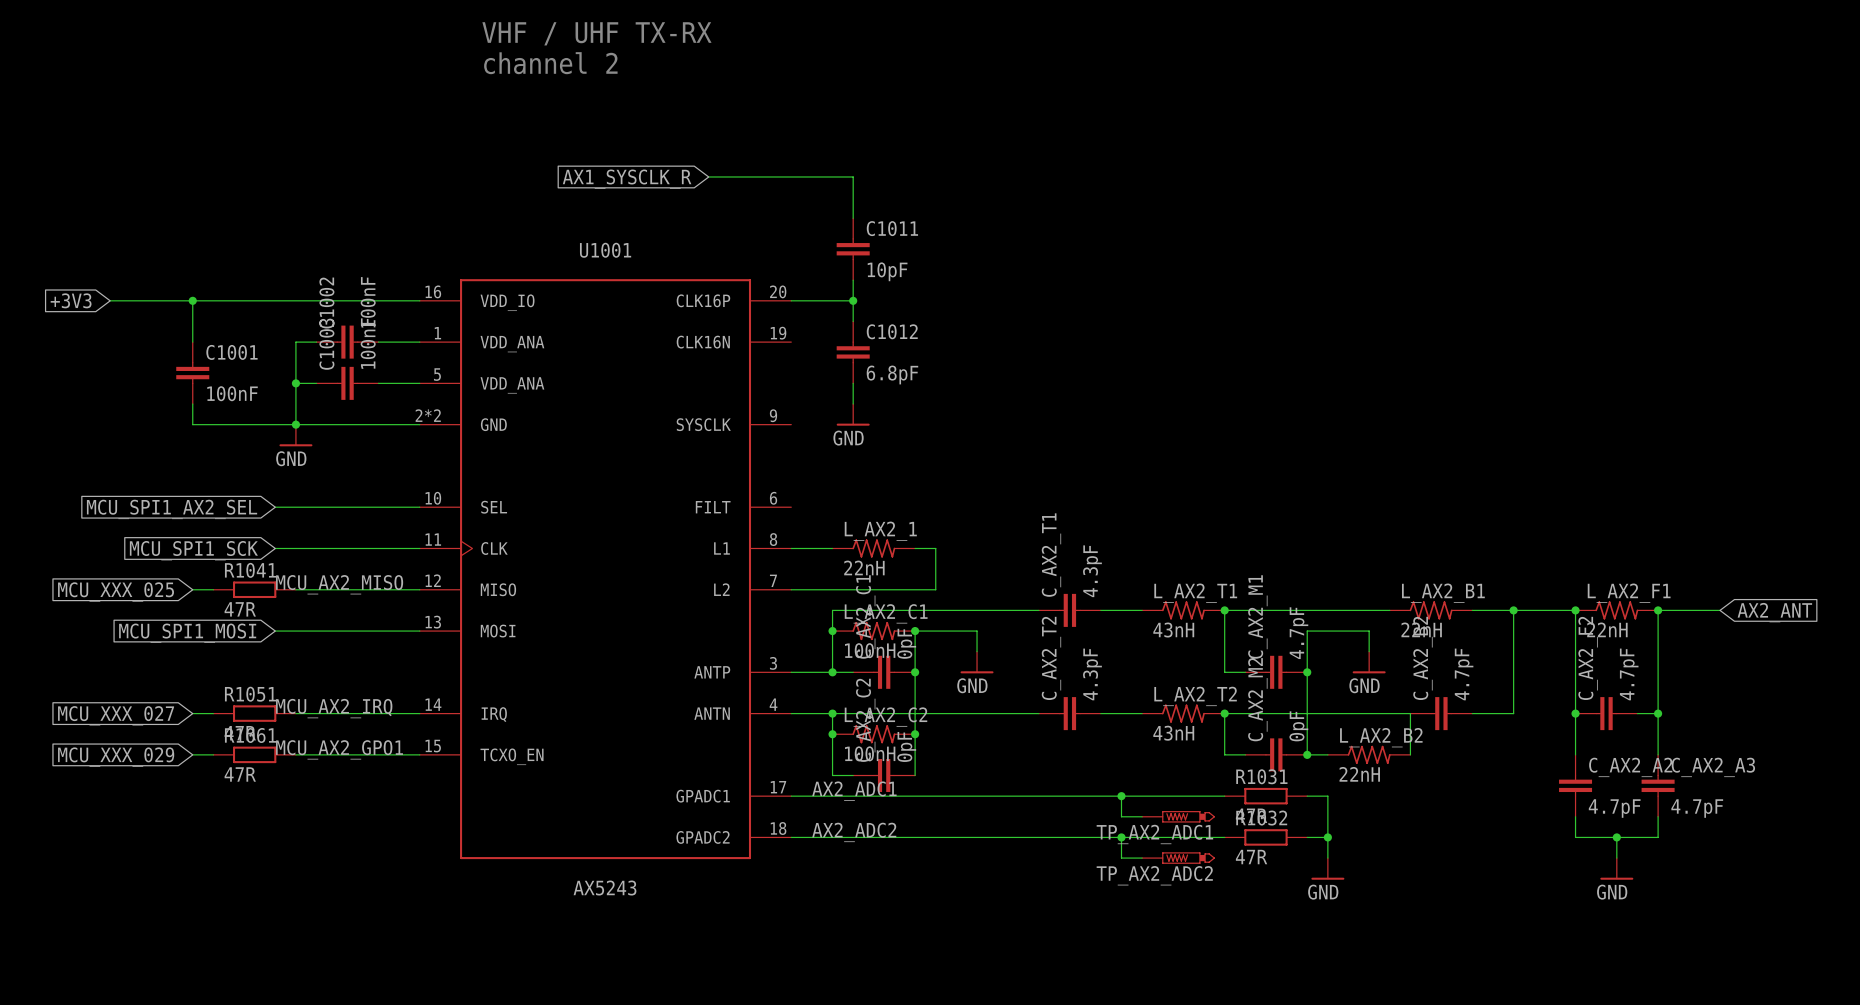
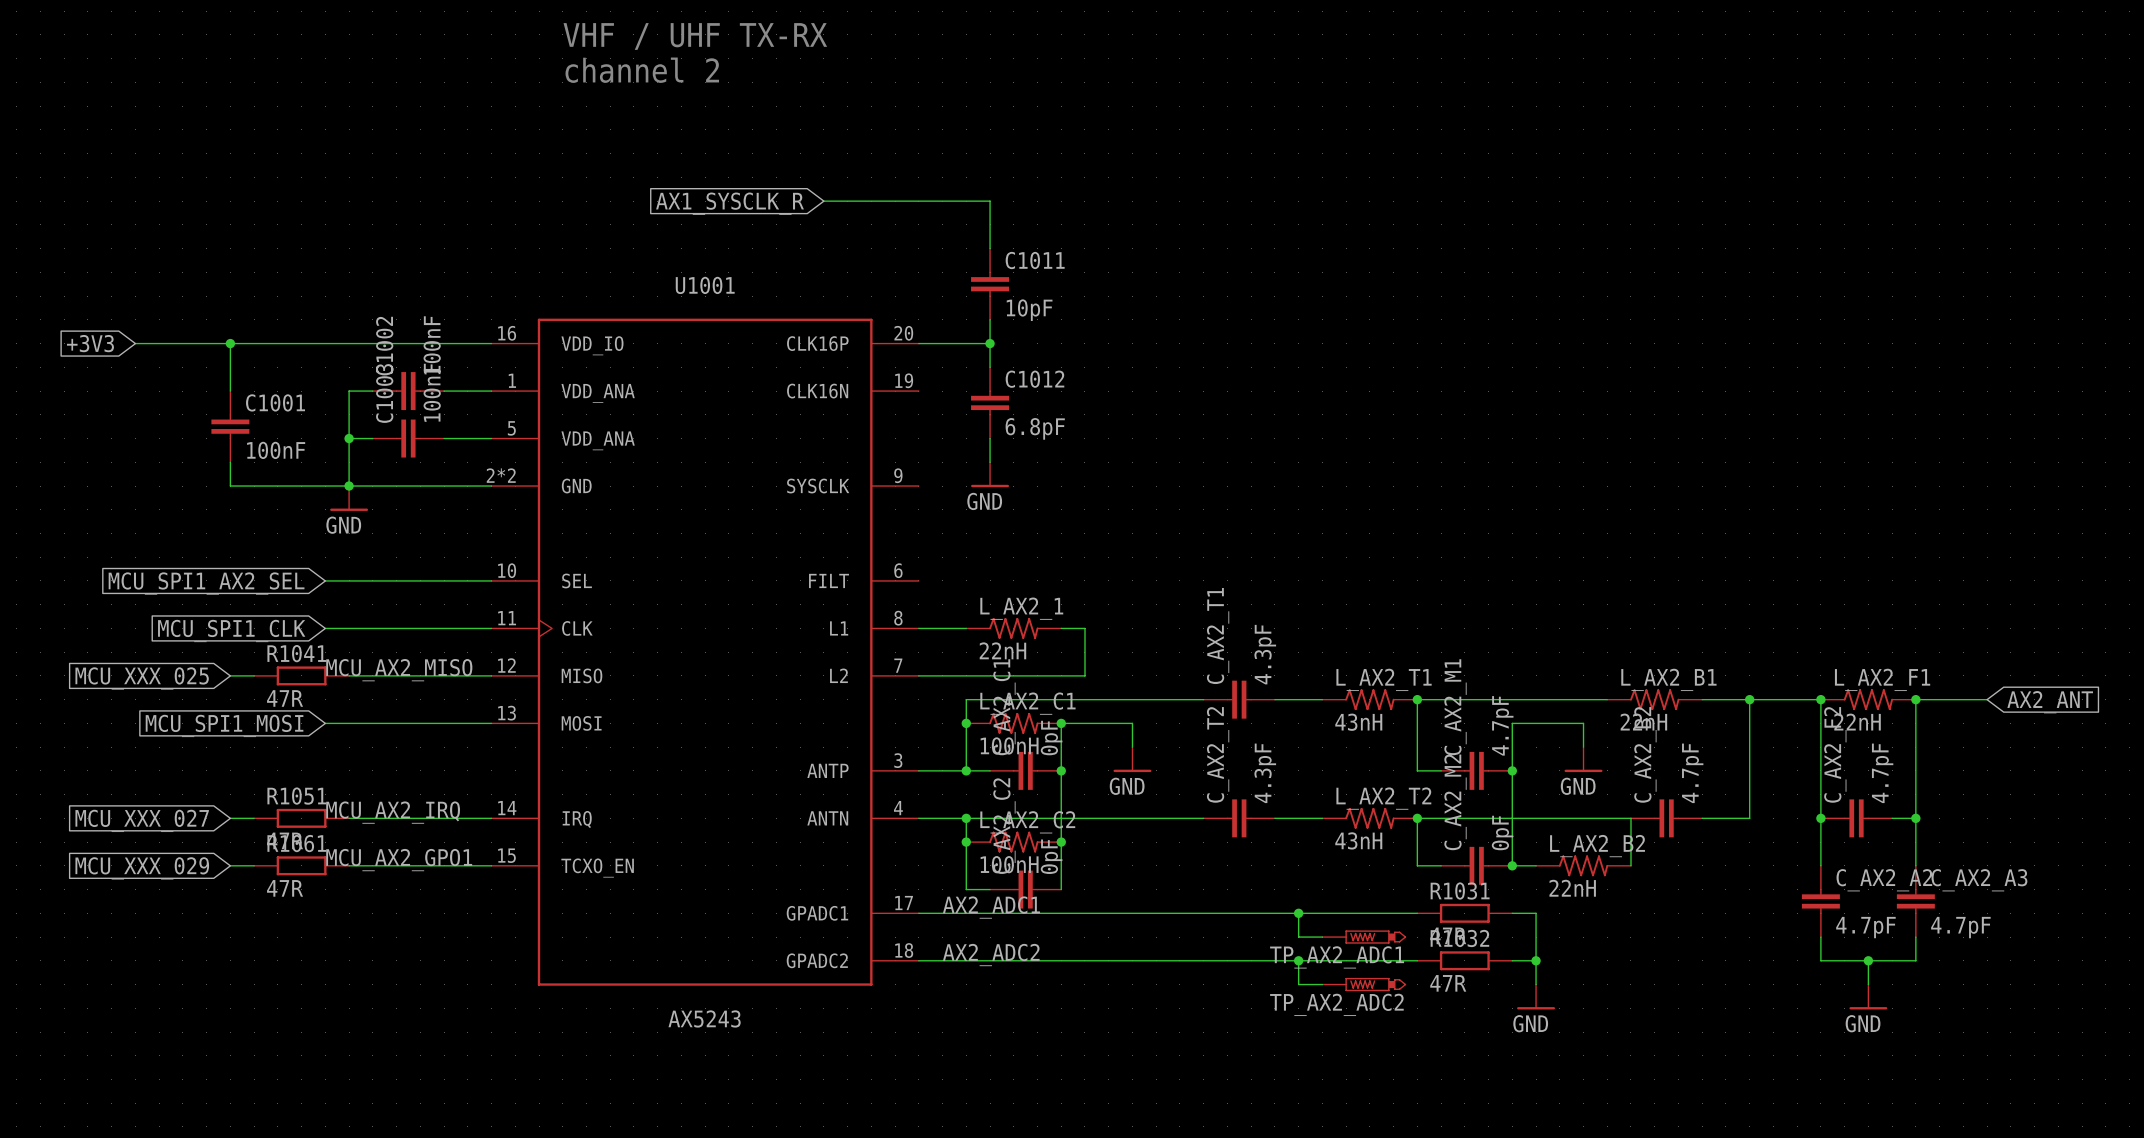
global label: MCU_SPI1_SCK (193, 550) -> MCU_SPI1_CLK (231, 630)

